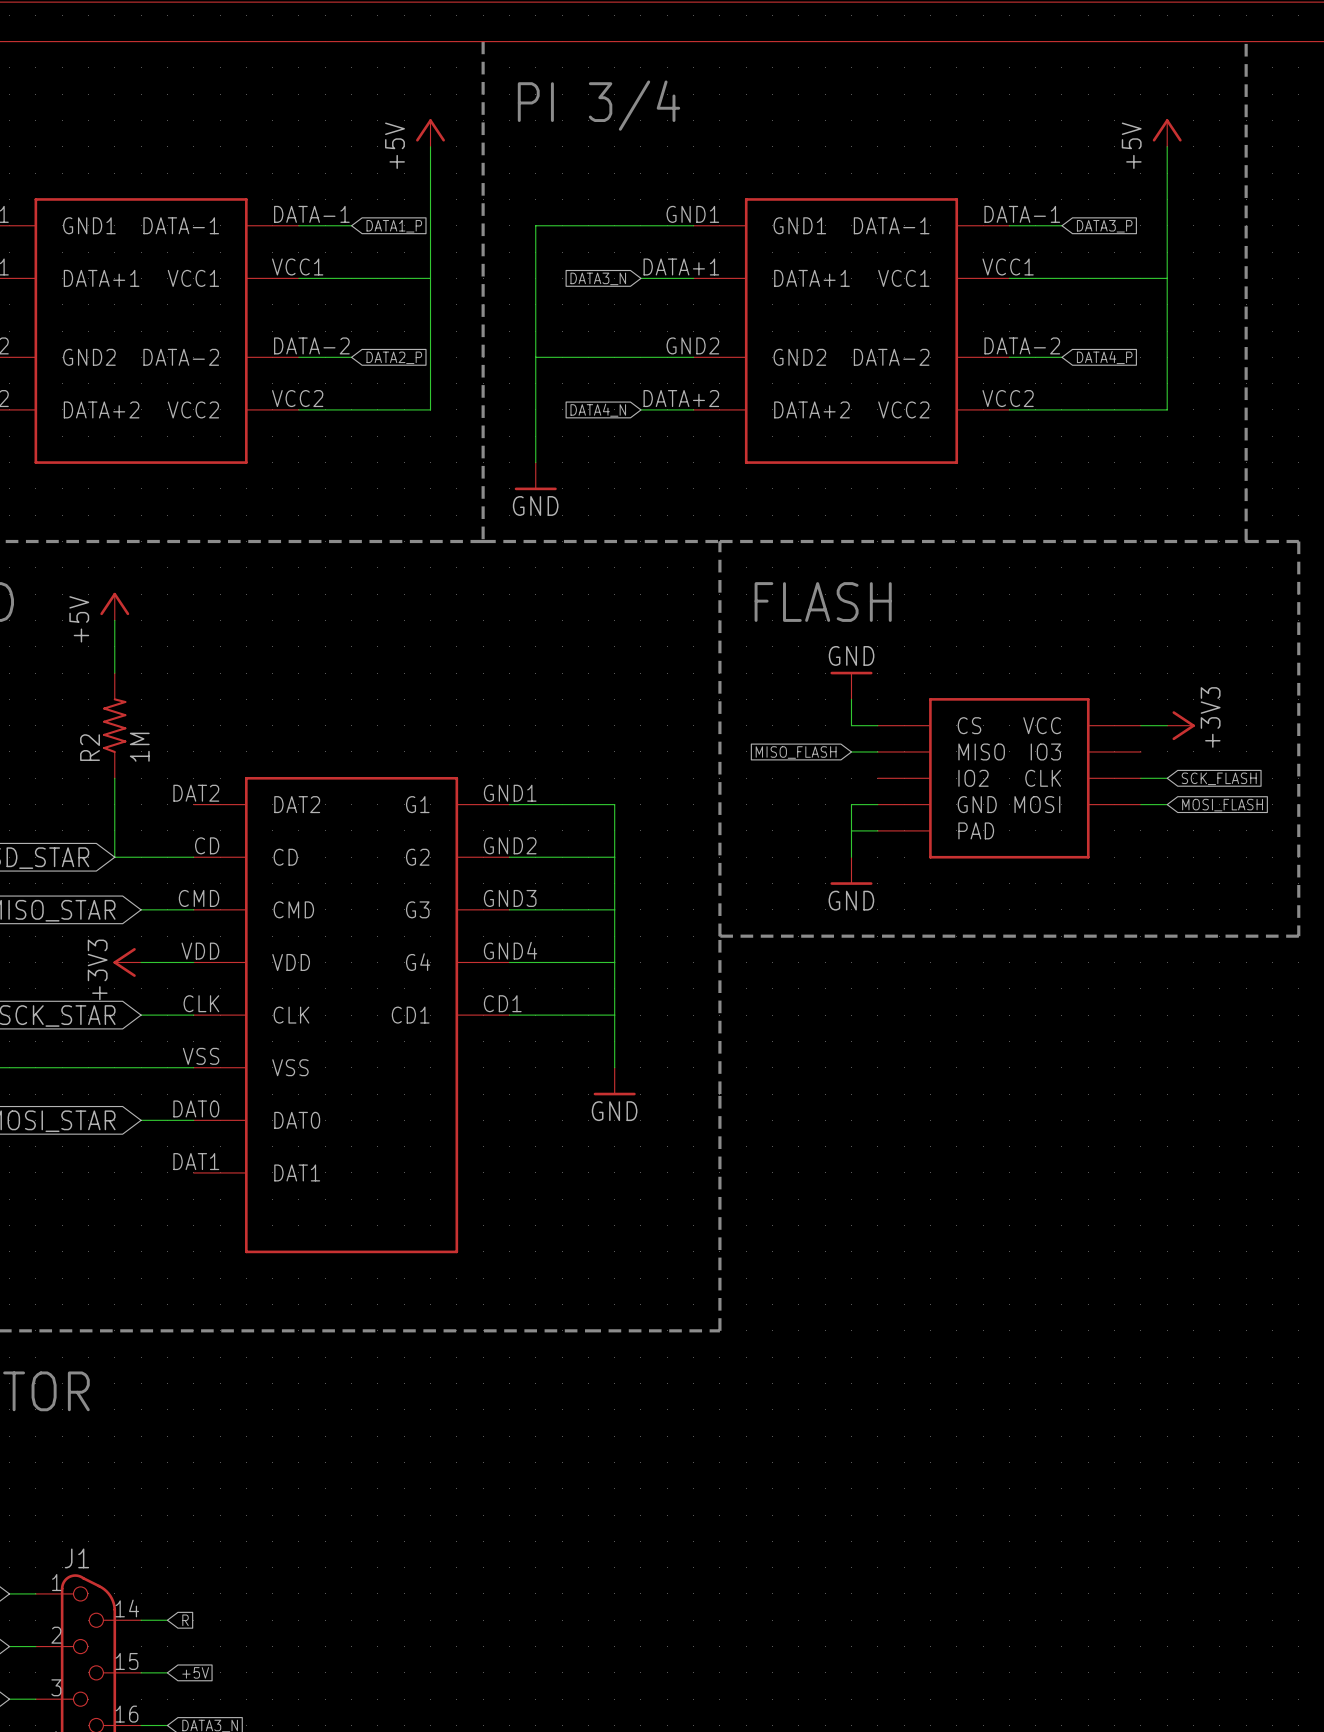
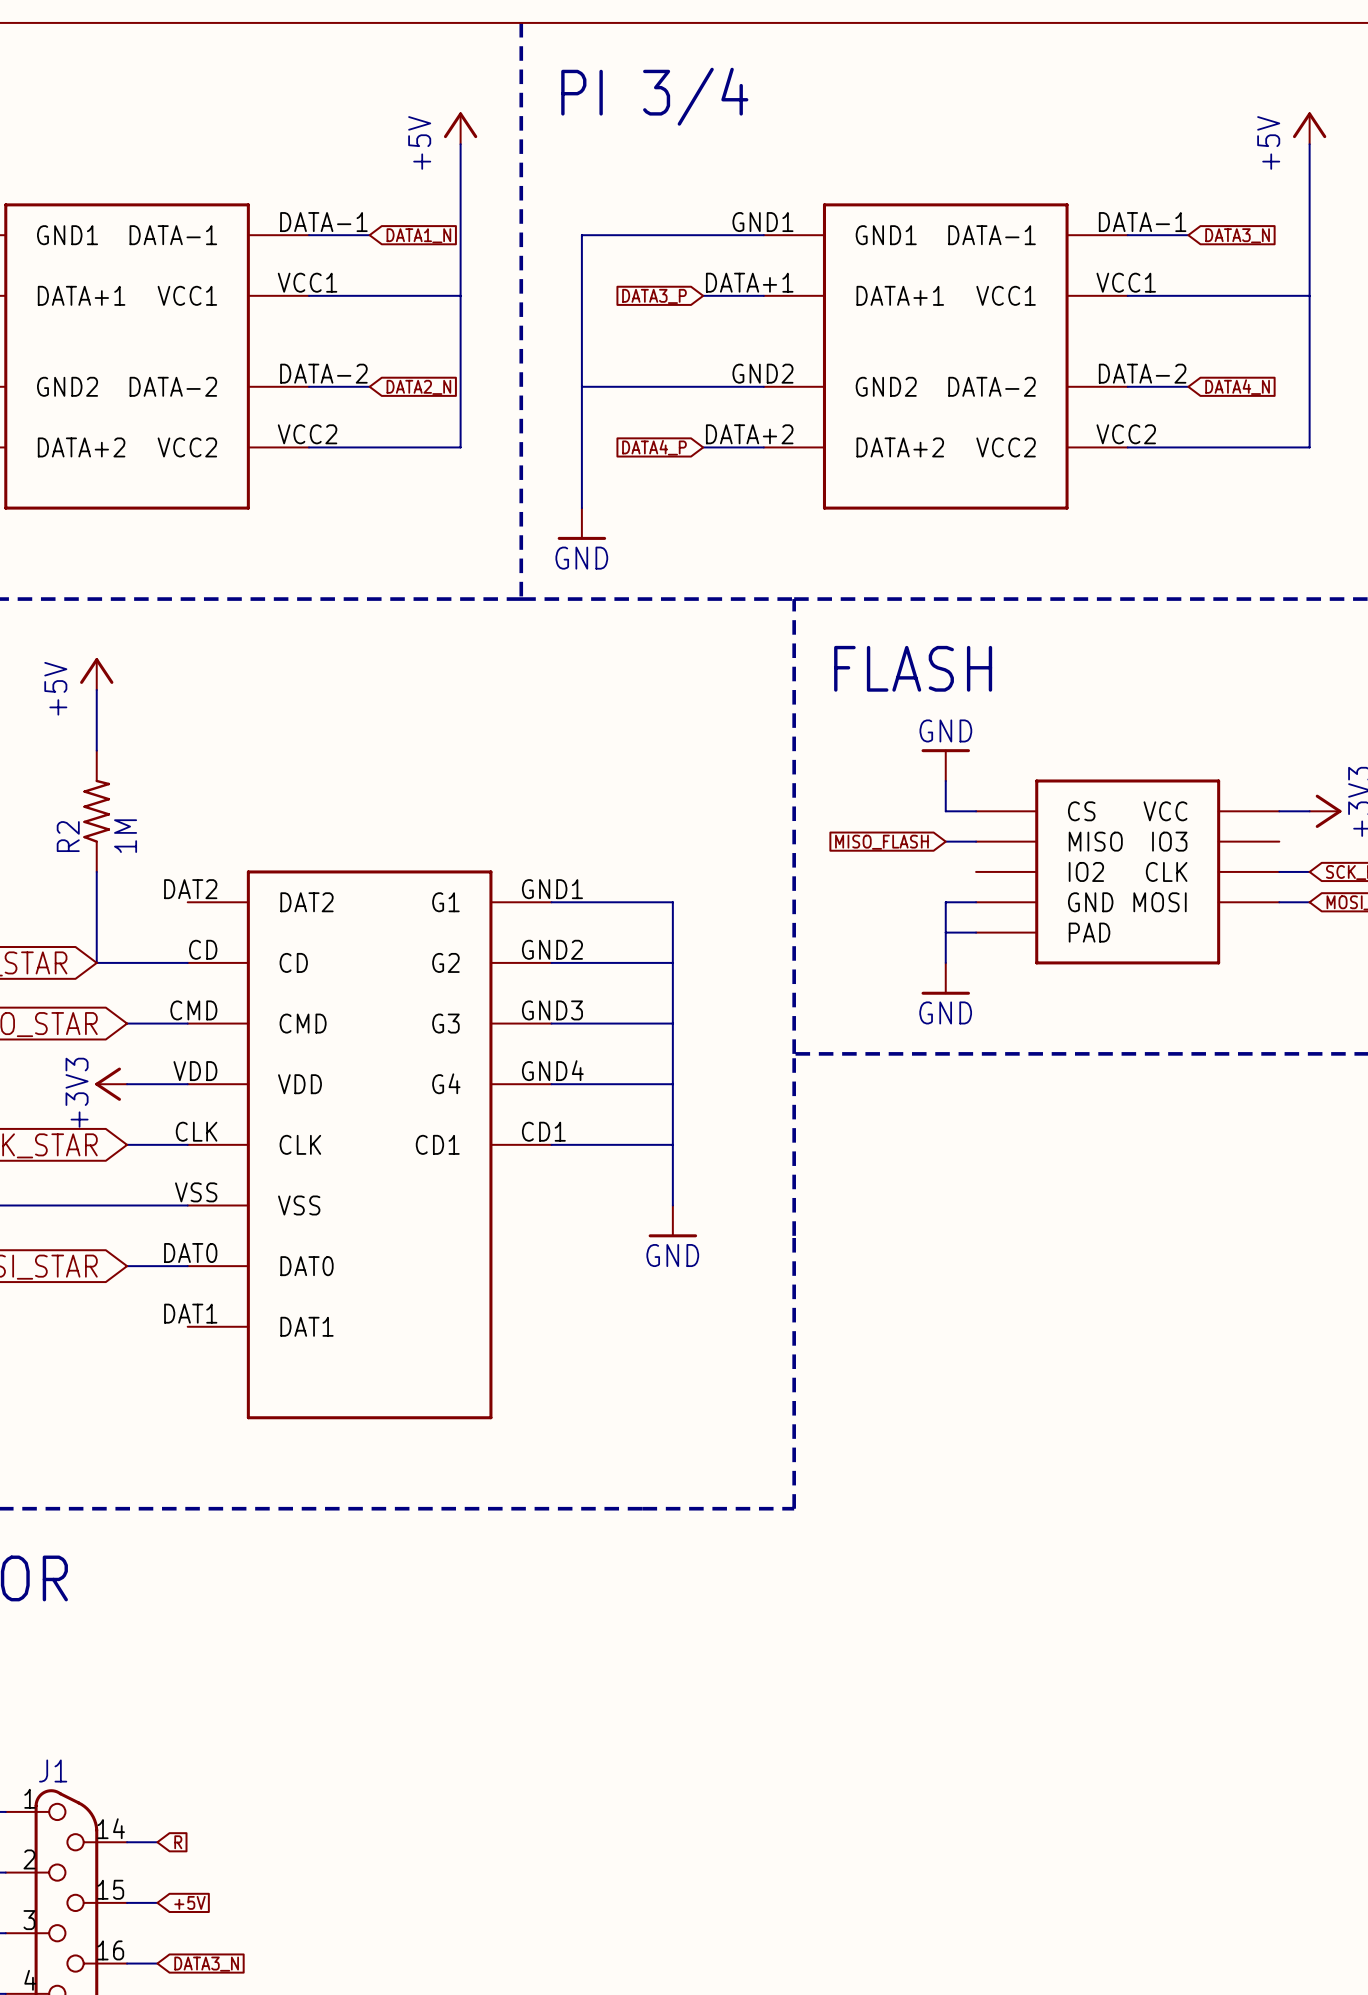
global label: DATA1_P (394, 226) -> DATA1_N (418, 235)
global label: DATA3_P (1104, 226) -> DATA3_N (1237, 235)
global label: DATA3_N (598, 278) -> DATA3_P (654, 296)
global label: DATA2_P (394, 357) -> DATA2_N (418, 387)
global label: DATA4_P (1104, 357) -> DATA4_N (1237, 387)
global label: DATA4_N (598, 410) -> DATA4_P (654, 447)

